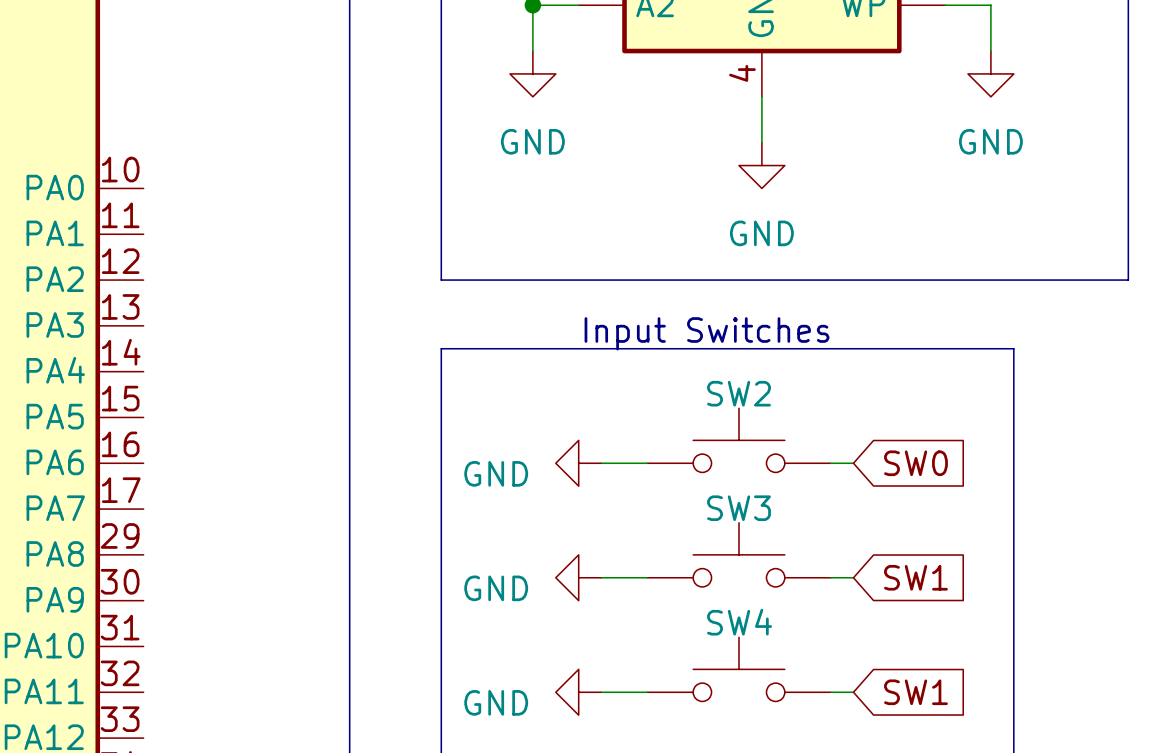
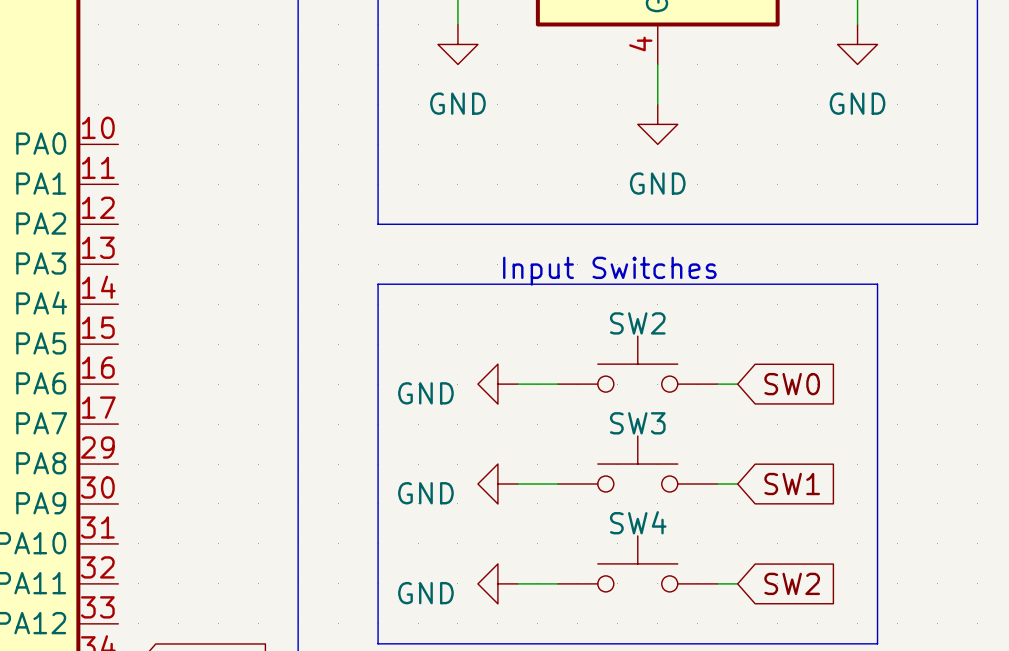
global label: SW1 (915, 692) -> SW2 (792, 583)

